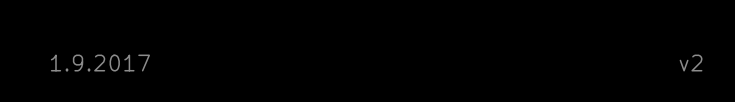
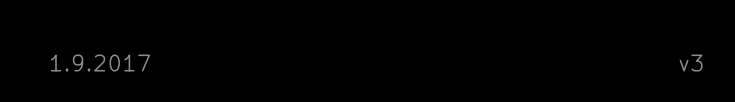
text: v2 (691, 63) -> v3 (691, 63)

